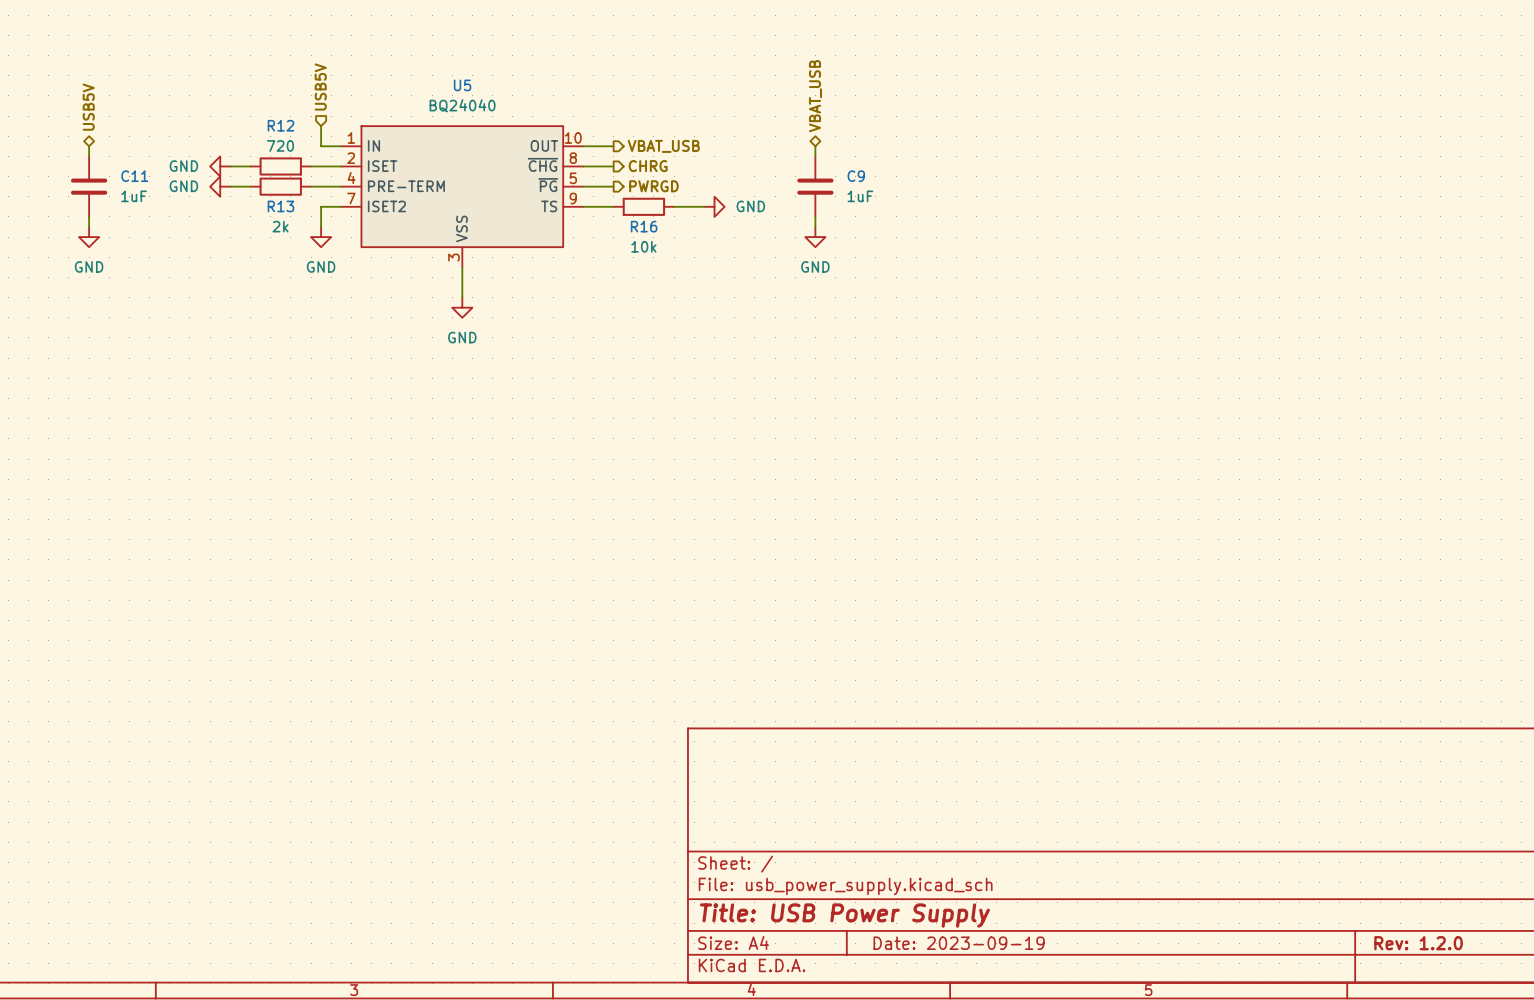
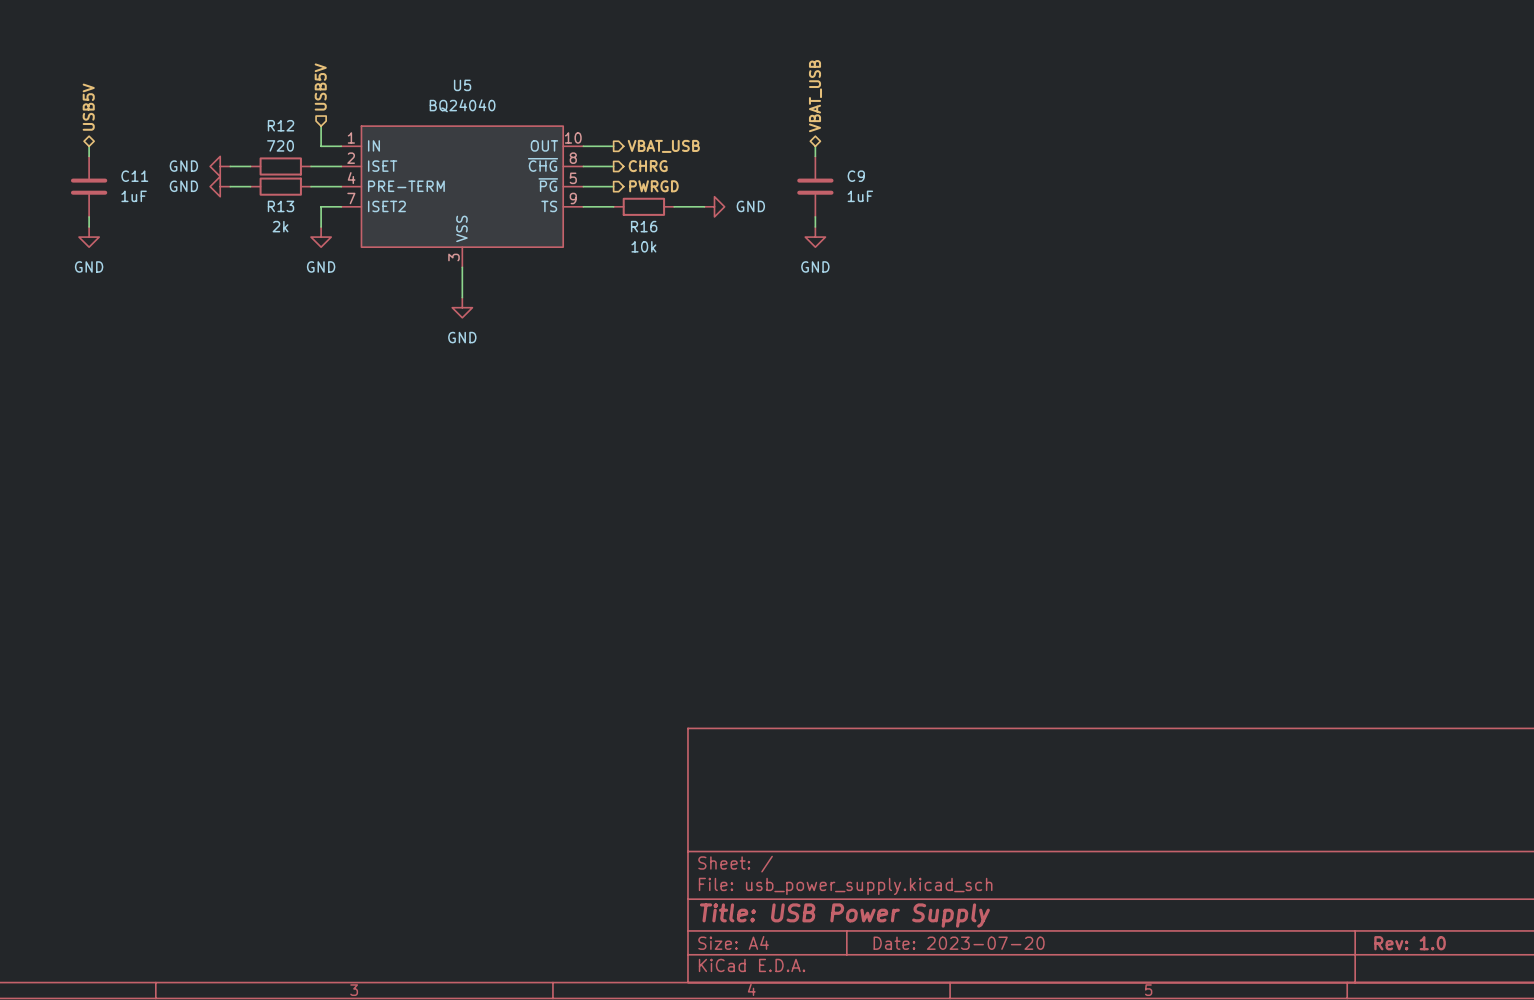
title block: Date: 2023-09-19 (959, 943) -> Date: 2023-07-20 (959, 943)
title block: Rev: 1.2.0 (1418, 943) -> Rev: 1.0 (1410, 943)

